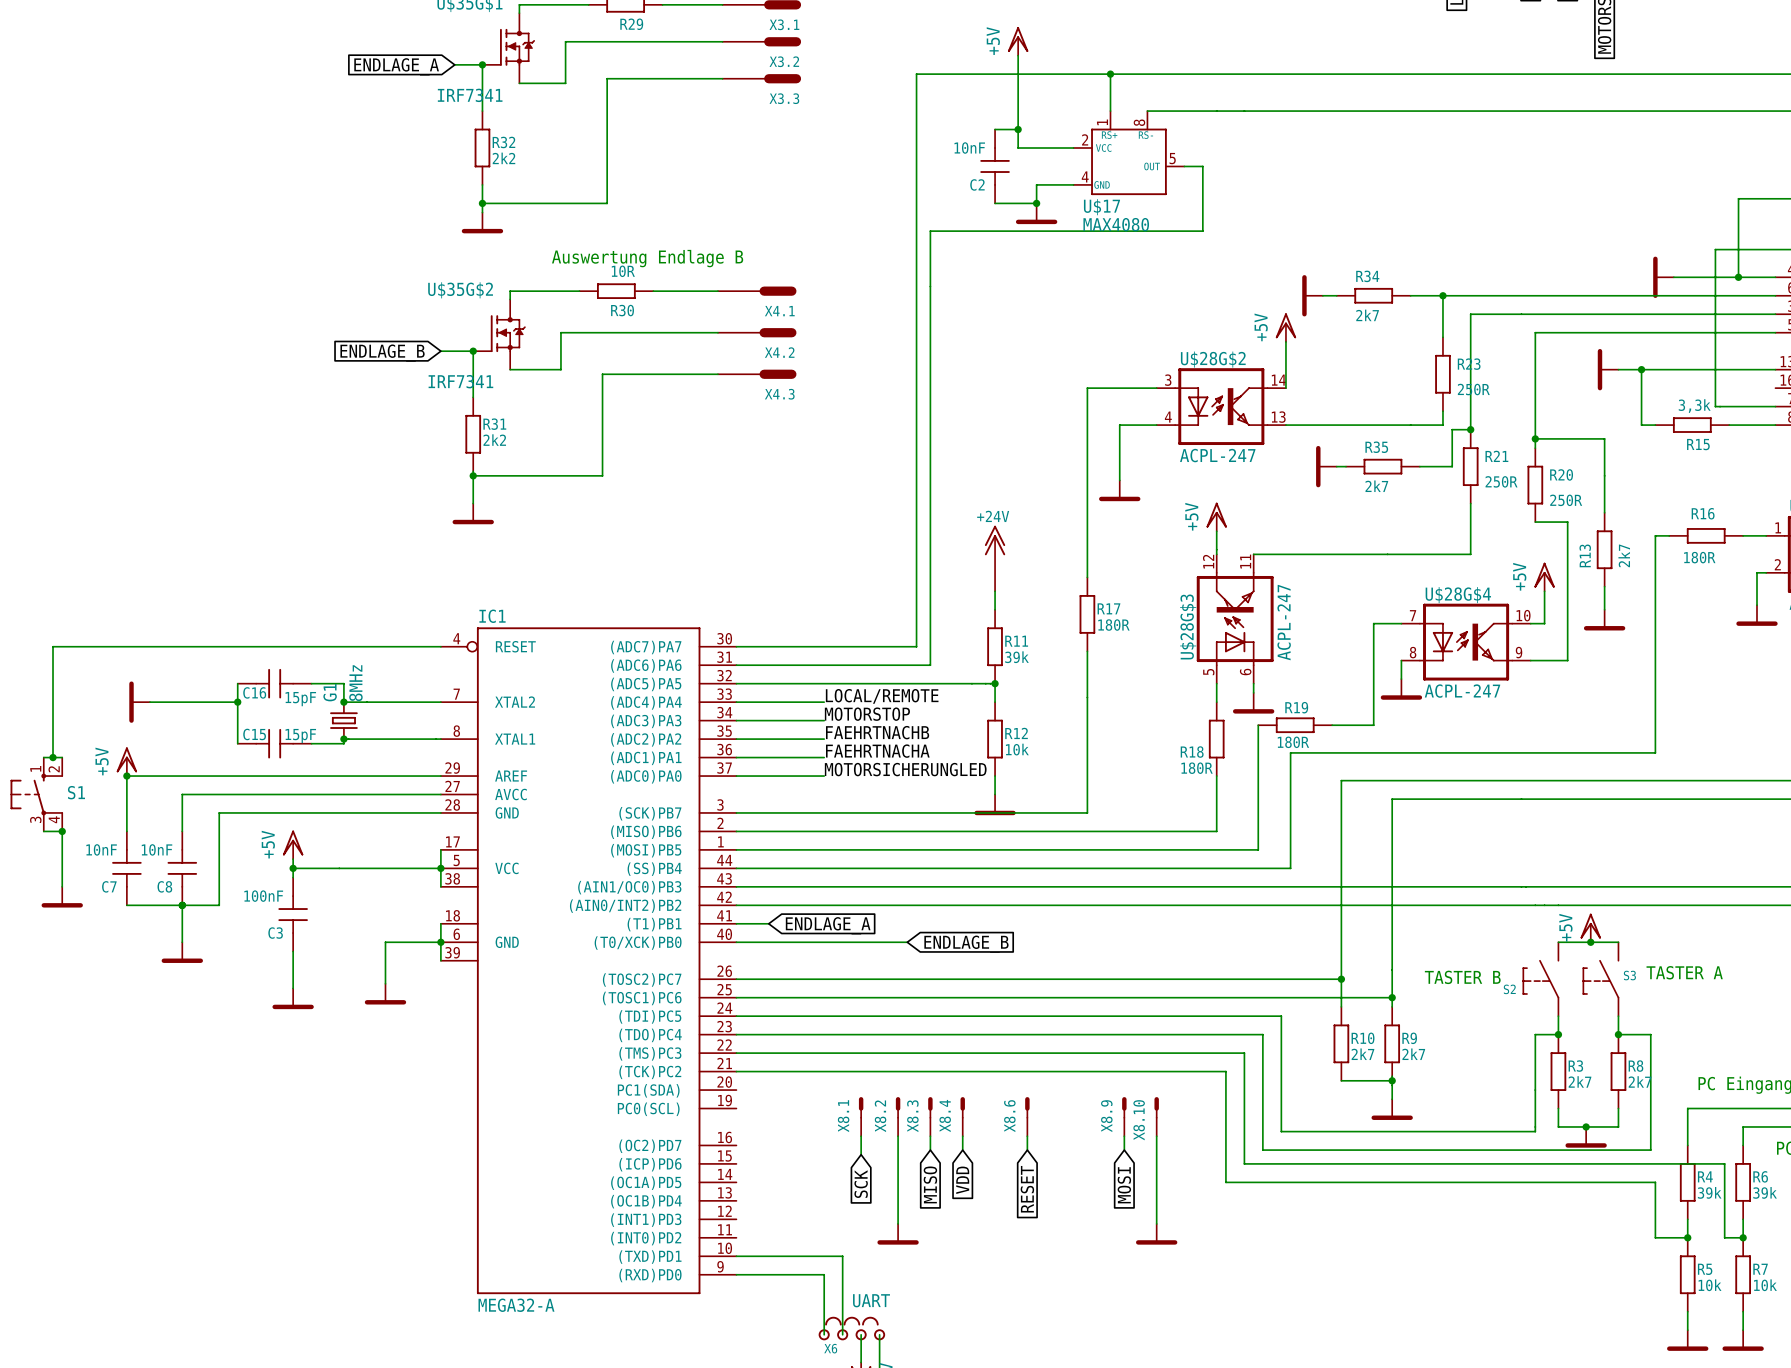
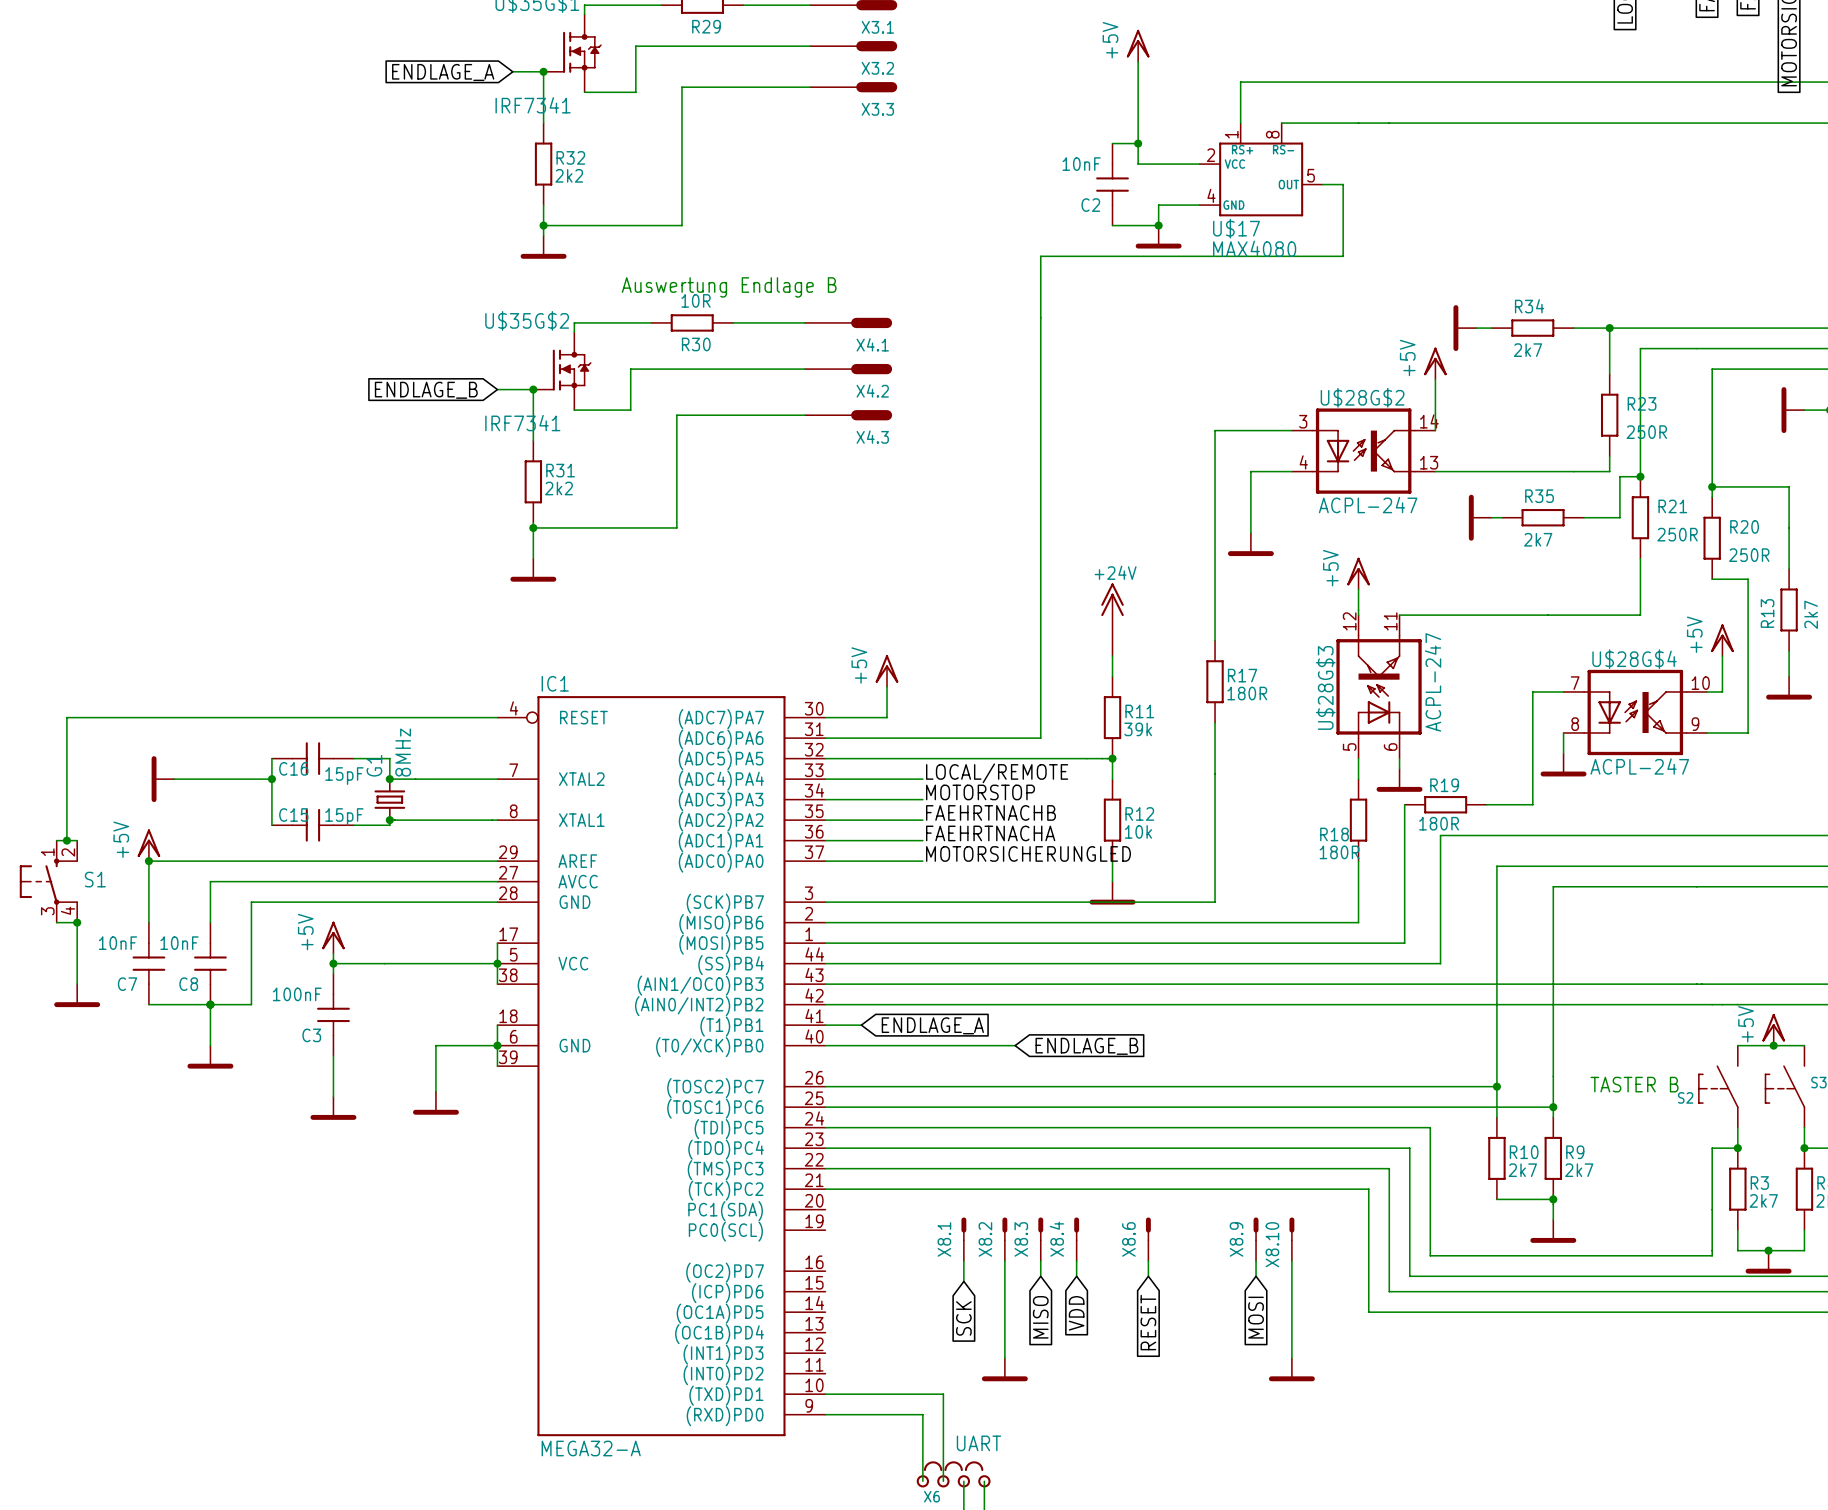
wire: (1110, 74) (916, 74) (916, 646) (791, 646) -> (886, 686) (886, 717)
junction: (1110, 74) -> none
power symbol: none -> +5V (886, 670)

